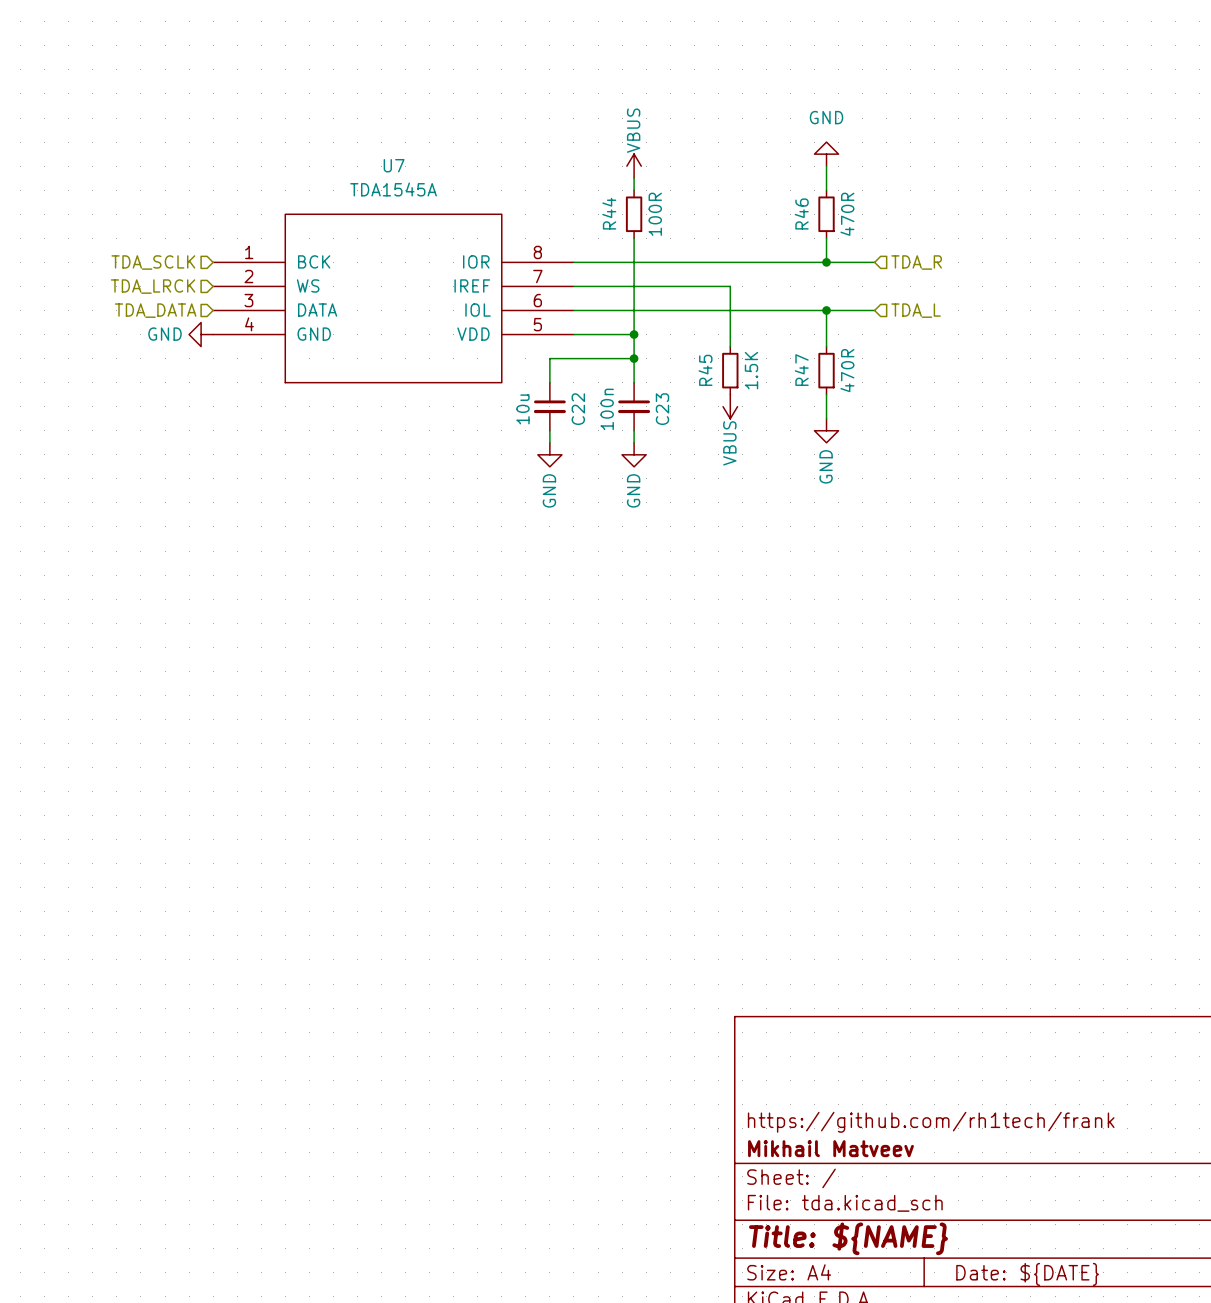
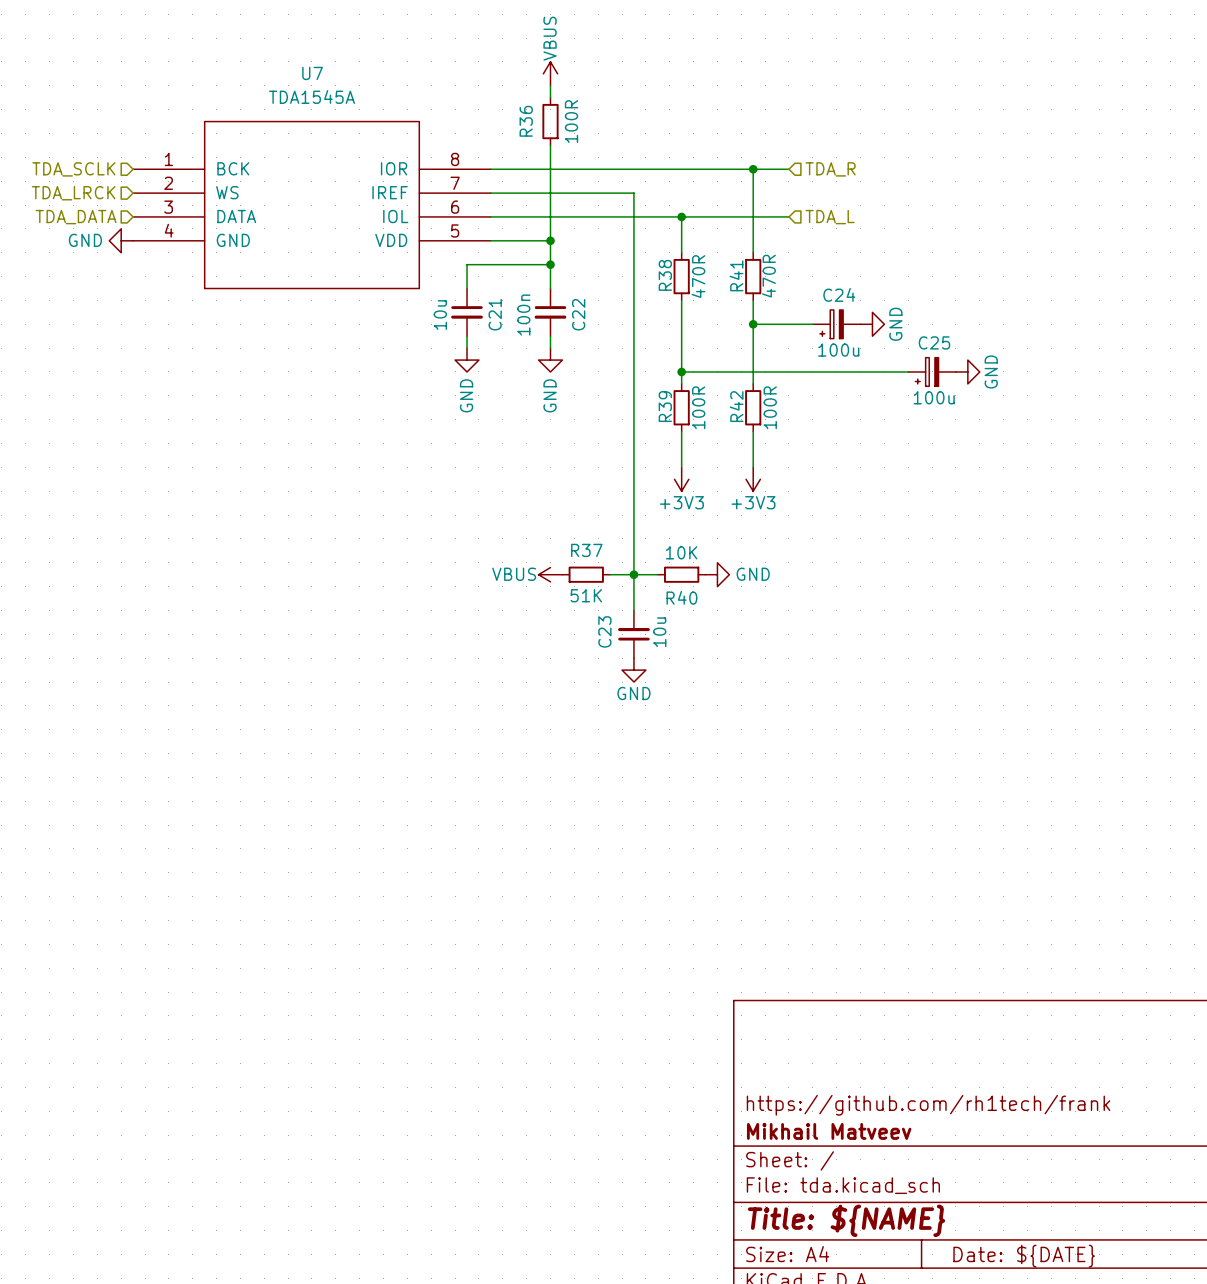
R36: none -> 100R (550, 121)
wire: none -> (550, 145) (550, 288)
power symbol: GND (826, 154) -> none
power symbol position: VBUS (634, 166) -> VBUS (550, 73)
wire: (826, 166) (826, 190) -> none
wire: (634, 178) (634, 190) -> (550, 85) (550, 97)
wire: none -> (753, 169) (753, 252)
junction: none -> (753, 169)
wire: none -> (490, 193) (633, 193) (633, 228)
R44: 100R (634, 214) -> none
R46: 470R (826, 214) -> none
wire: none -> (681, 216) (681, 252)
junction: none -> (681, 216)
wire: (826, 238) (826, 262) -> none
junction: none -> (550, 240)
hierarchical label position: TDA_SCLK (153, 262) -> TDA_SCLK (73, 169)
wire: (573, 262) (874, 262) -> (490, 169) (788, 169)
junction: (826, 262) -> none
hierarchical label position: TDA_R (916, 262) -> TDA_R (830, 169)
junction: none -> (550, 264)
hierarchical label position: TDA_LRCK (153, 286) -> TDA_LRCK (73, 193)
wire: (573, 286) (730, 286) (730, 346) -> none
R38: none -> 470R (681, 276)
R41: none -> 470R (753, 276)
U7 position: (393, 298) -> (311, 205)
hierarchical label position: TDA_DATA (155, 310) -> TDA_DATA (76, 217)
wire: (573, 310) (874, 310) -> (490, 216) (788, 216)
wire: none -> (681, 300) (681, 383)
wire: none -> (753, 300) (753, 383)
wire: (826, 310) (826, 346) -> (753, 431) (753, 467)
junction: (826, 310) -> none
hierarchical label position: TDA_L (916, 310) -> TDA_L (830, 217)
C21: none -> 10u (467, 312)
power symbol position: GND (201, 334) -> GND (121, 240)
wire: (573, 334) (634, 334) -> (490, 240) (550, 240)
junction: (634, 334) -> none
wire: none -> (753, 324) (812, 324)
junction: none -> (753, 324)
C24: none -> 100u (836, 324)
power symbol: none -> GND (872, 324)
wire: none -> (550, 336) (550, 348)
wire: (634, 358) (549, 358) (549, 382) -> (550, 264) (467, 264) (467, 288)
junction: (634, 358) -> none
power symbol: none -> GND (467, 360)
power symbol: none -> GND (550, 360)
R45: 1.5K (730, 370) -> none
R47: 470R (826, 370) -> none
wire: none -> (681, 371) (908, 371)
junction: none -> (681, 371)
C25: none -> 100u (932, 371)
power symbol: none -> GND (967, 371)
wire: (826, 394) (826, 418) -> none
C22 position: (549, 406) -> (550, 312)
C23 rotation: 0° (634, 406) -> 180° (633, 634)
C23 position: (634, 406) -> (633, 634)
power symbol: VBUS (730, 406) -> none
C22 value: 10u (522, 409) -> 100n (523, 315)
C23 value: 100n (607, 409) -> 10u (659, 632)
R39: none -> 100R (681, 407)
R42: none -> 100R (753, 407)
wire: (549, 430) (549, 442) -> (467, 336) (467, 348)
power symbol: GND (826, 430) -> none
wire: none -> (633, 431) (633, 610)
wire: none -> (681, 431) (681, 467)
power symbol: GND (549, 454) -> none
power symbol: GND (634, 454) -> none
power symbol: none -> +3V3 (681, 479)
power symbol: none -> +3V3 (753, 479)
power symbol: none -> VBUS (550, 574)
R37: none -> 51K (586, 574)
wire: none -> (610, 574) (657, 574)
junction: none -> (633, 574)
R40: none -> 10K (681, 574)
power symbol: none -> GND (717, 574)
power symbol: none -> GND (633, 670)

